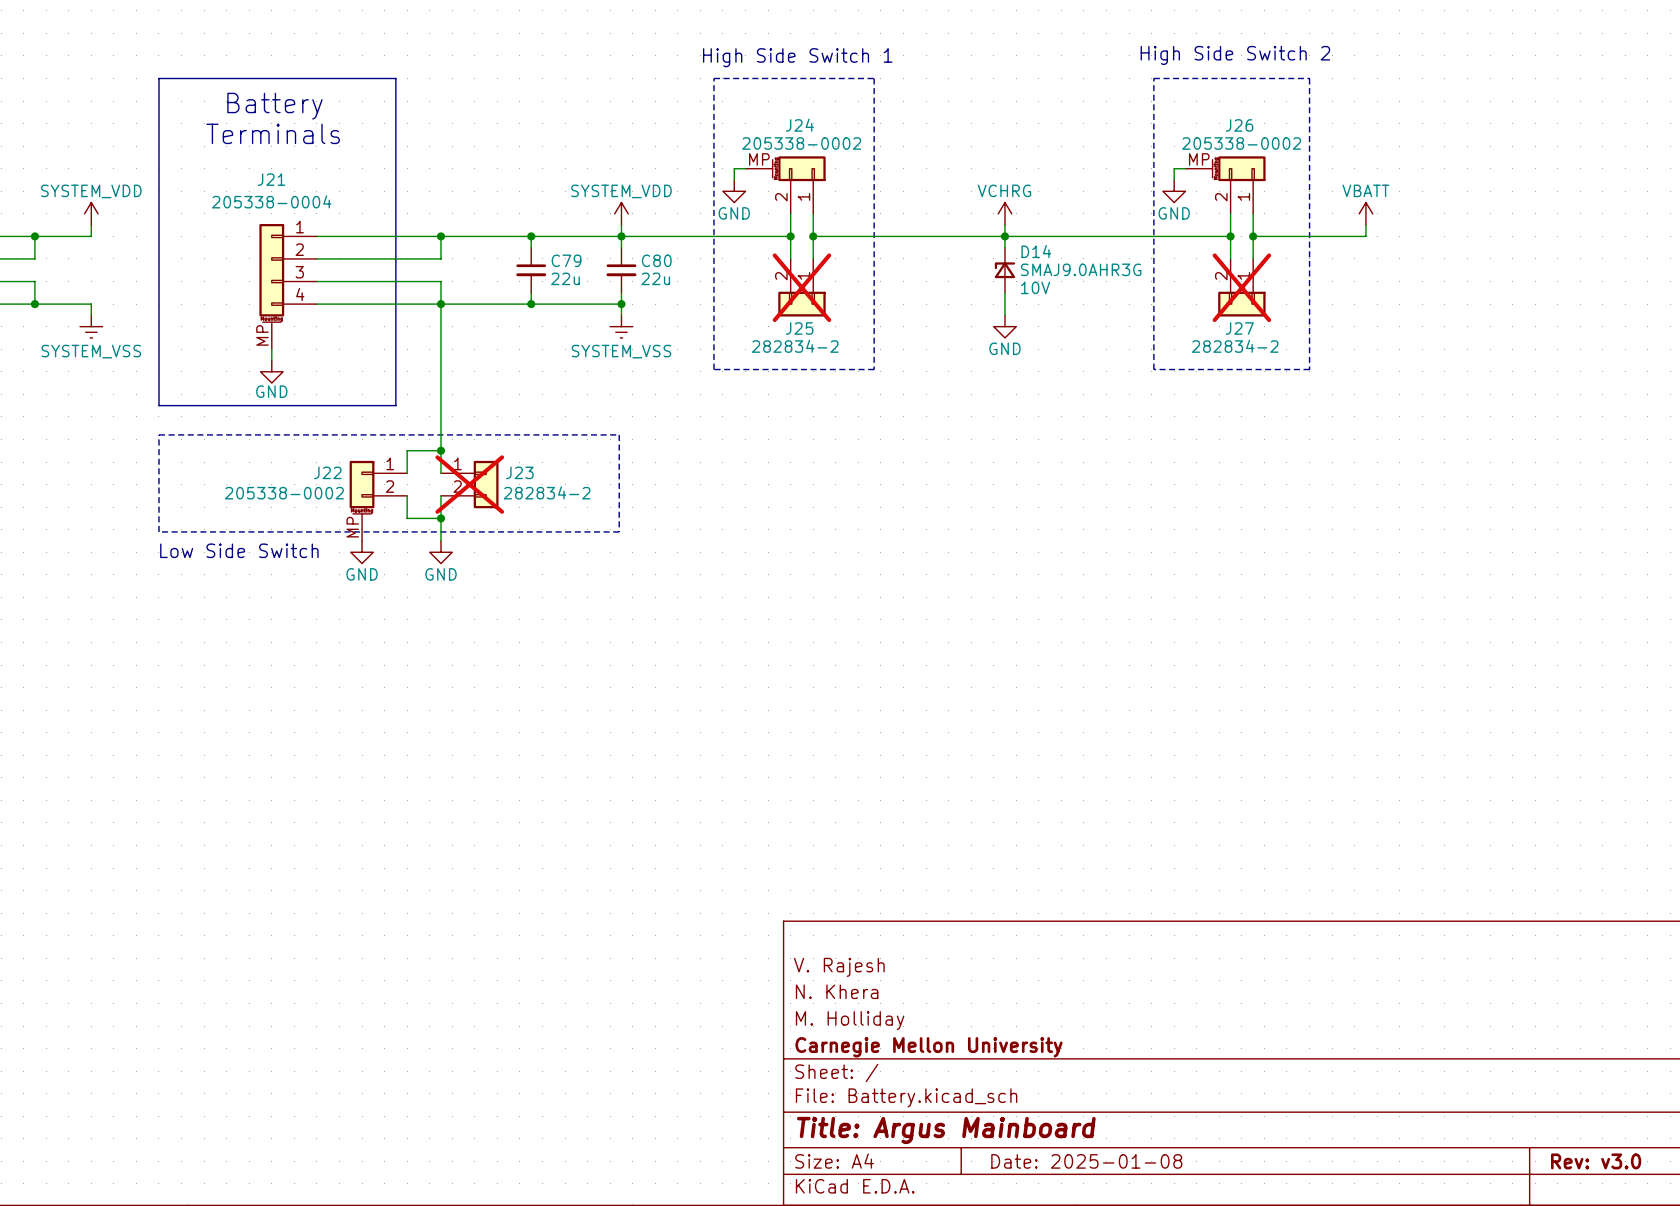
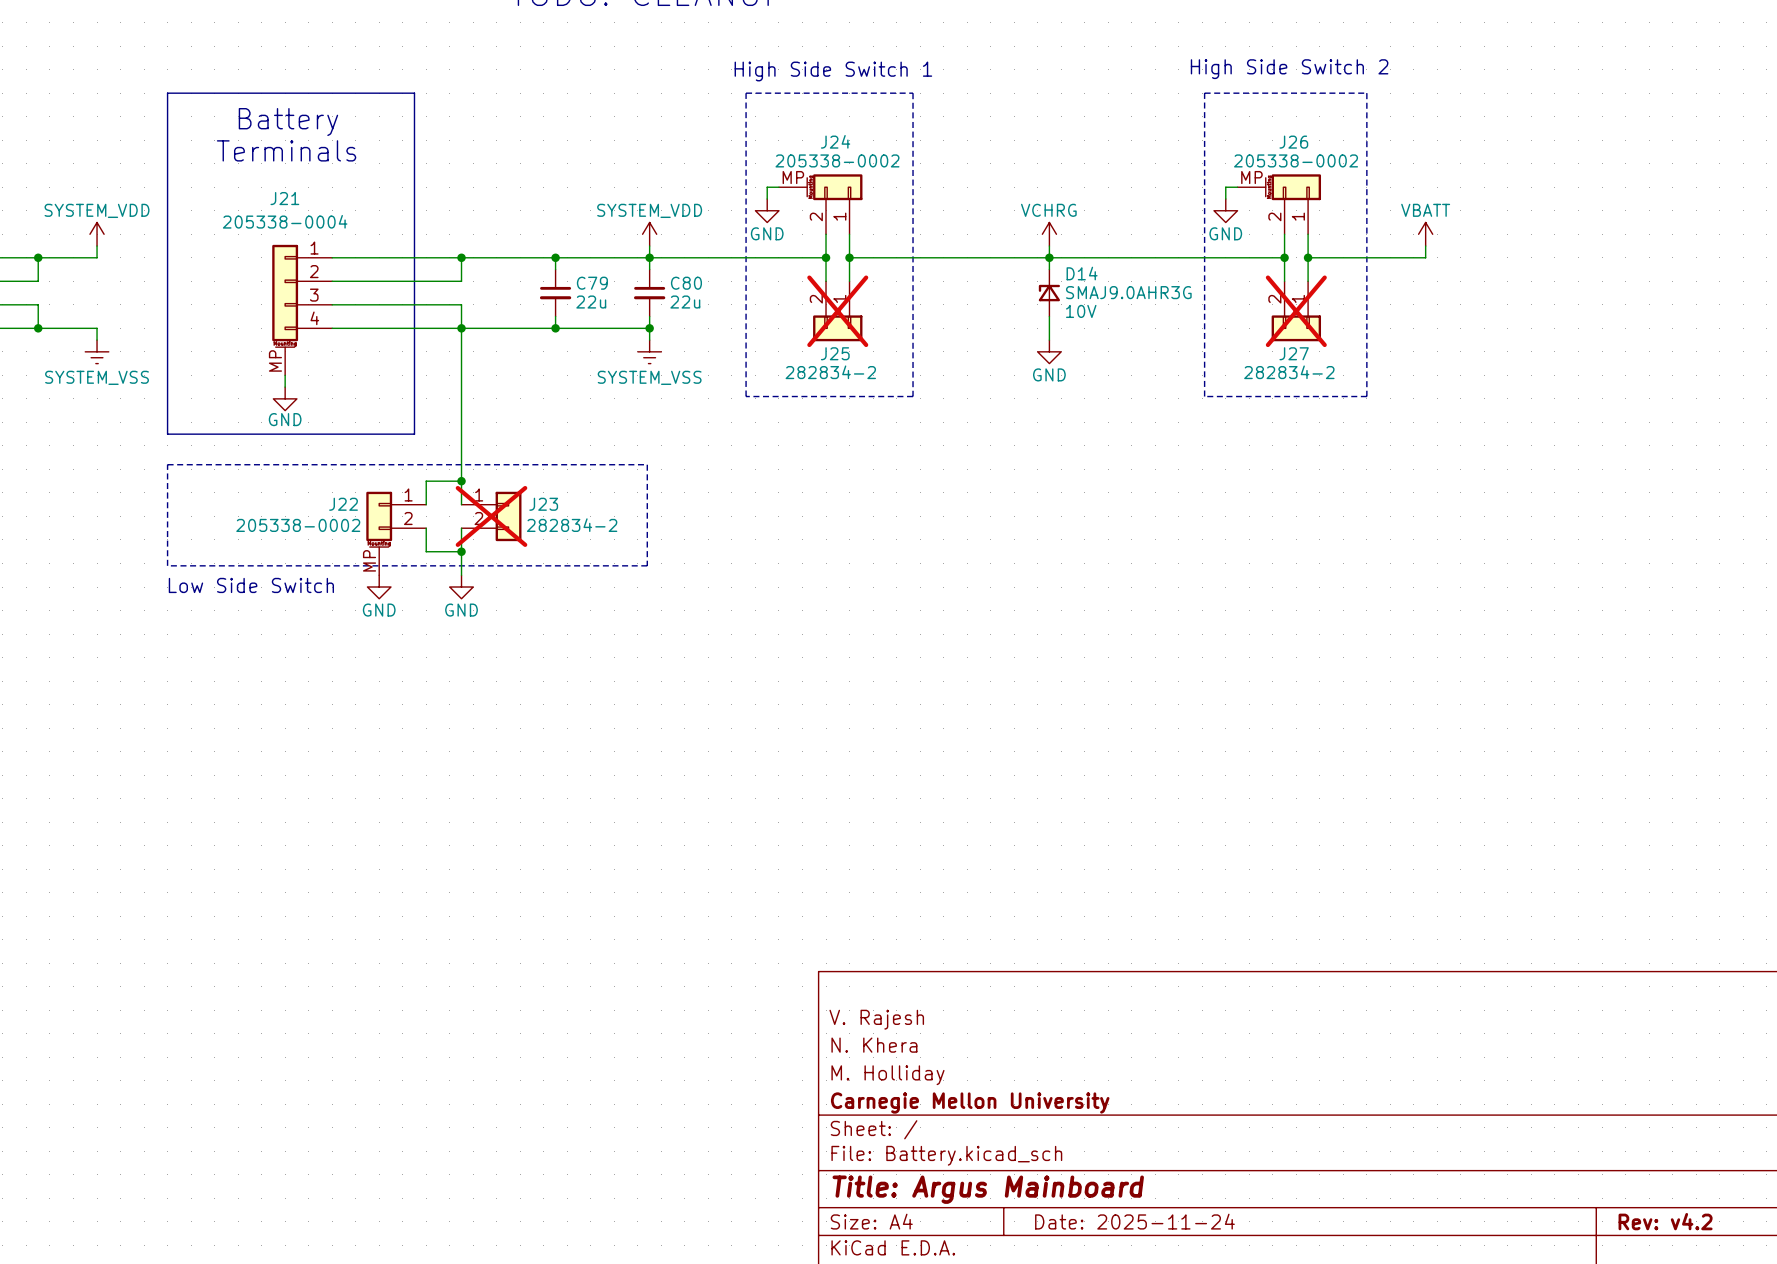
title block: Date: 2025-01-08 (1086, 1161) -> Date: 2025-11-24 (1134, 1221)
title block: Rev: v3.0 (1596, 1161) -> Rev: v4.2 (1665, 1221)

